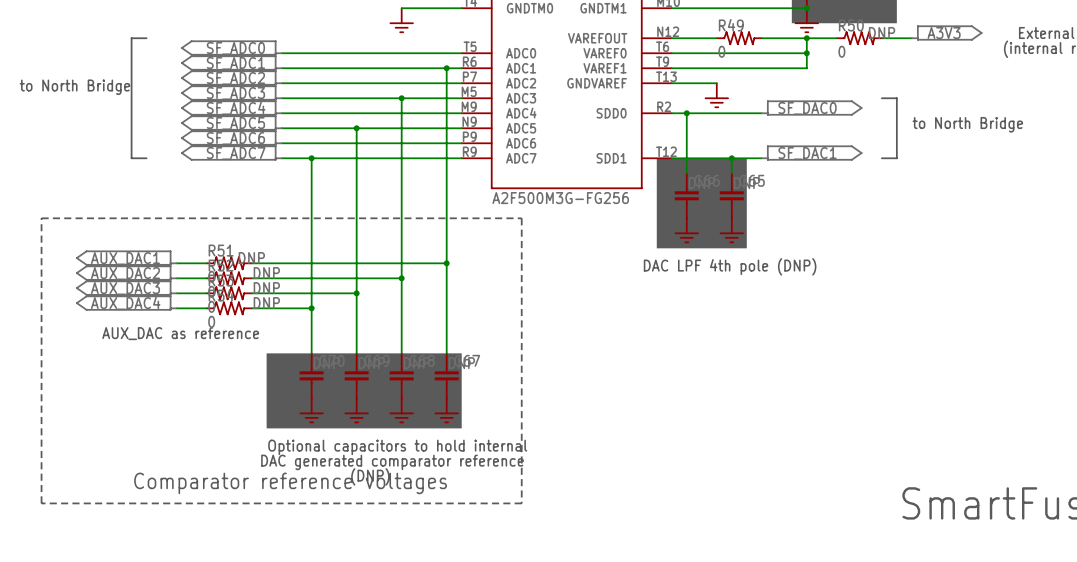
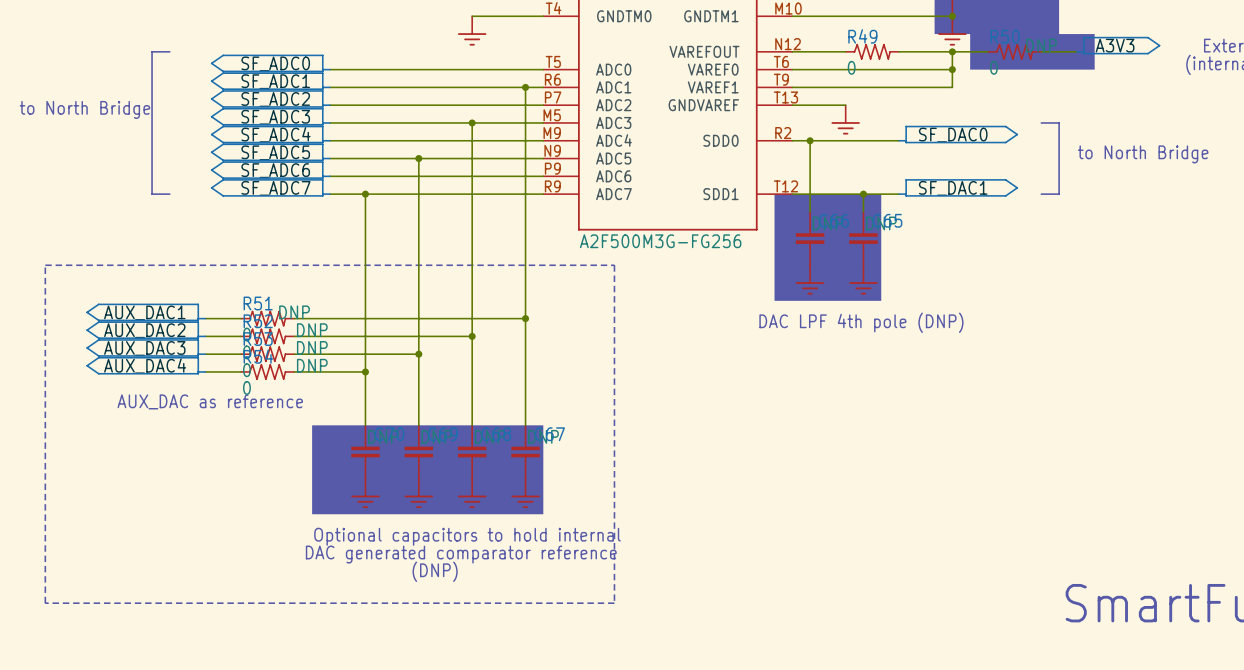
drawing: none -> [970, 34, 1095, 70]
text: Comparator reference voltages (290, 483) -> none

